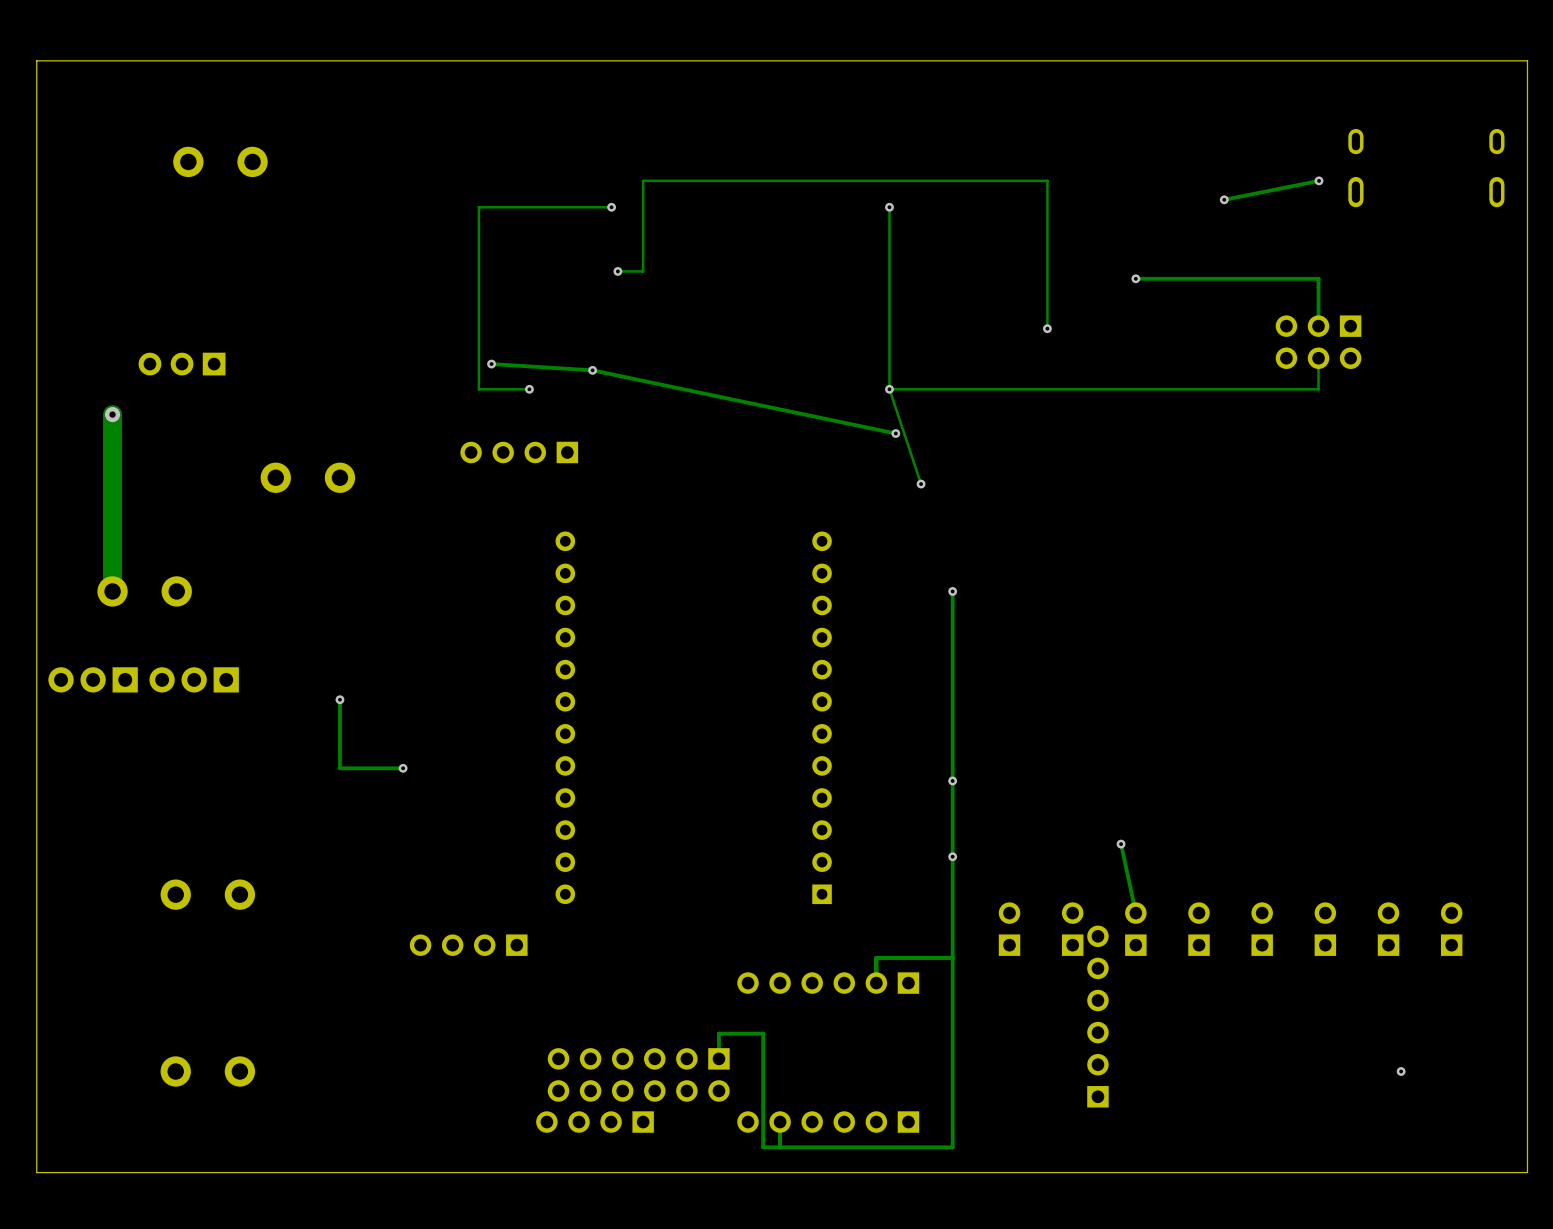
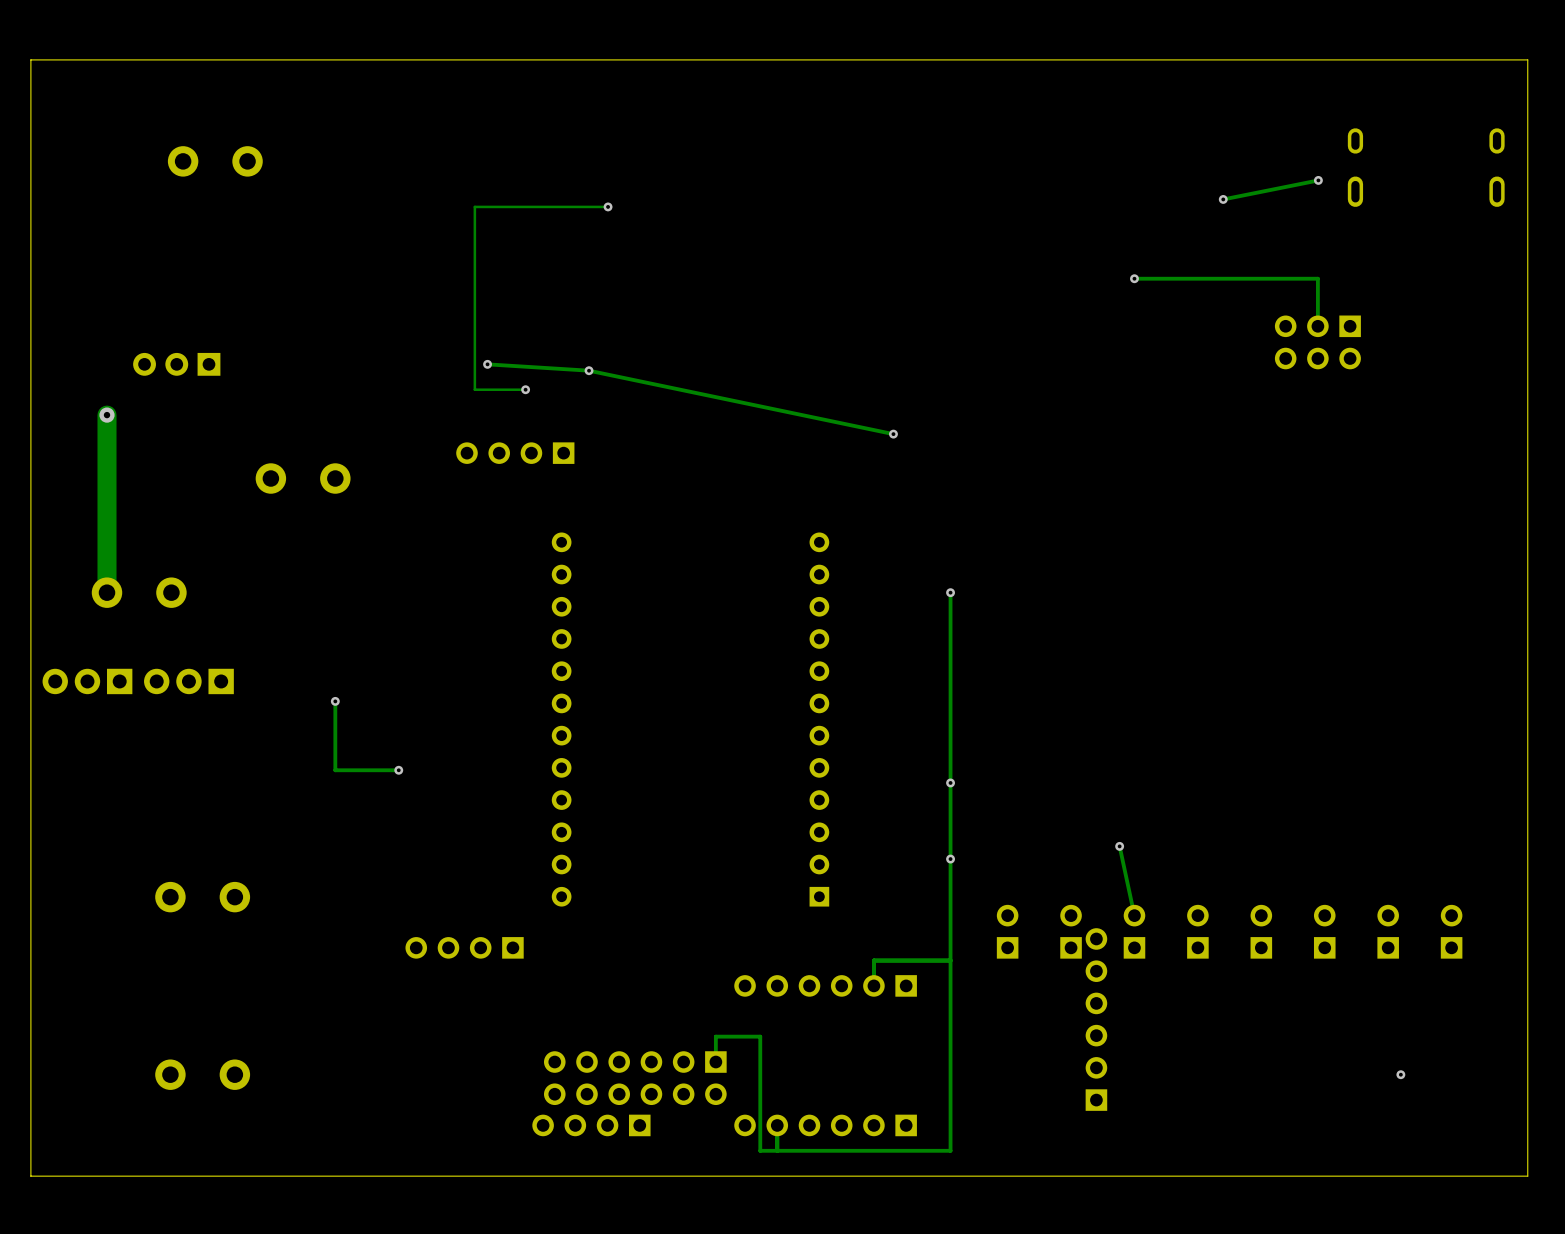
track: (889, 207) (889, 389) -> none
via: (889, 207) -> none
track: (617, 271) (643, 271) (643, 180) (1047, 180) (1047, 328) -> none
via: (617, 271) -> none
via: (1047, 328) -> none
track: (1318, 358) (1318, 389) (889, 389) -> none
track: (889, 389) (921, 484) -> none
via: (889, 389) -> none
via: (921, 484) -> none

